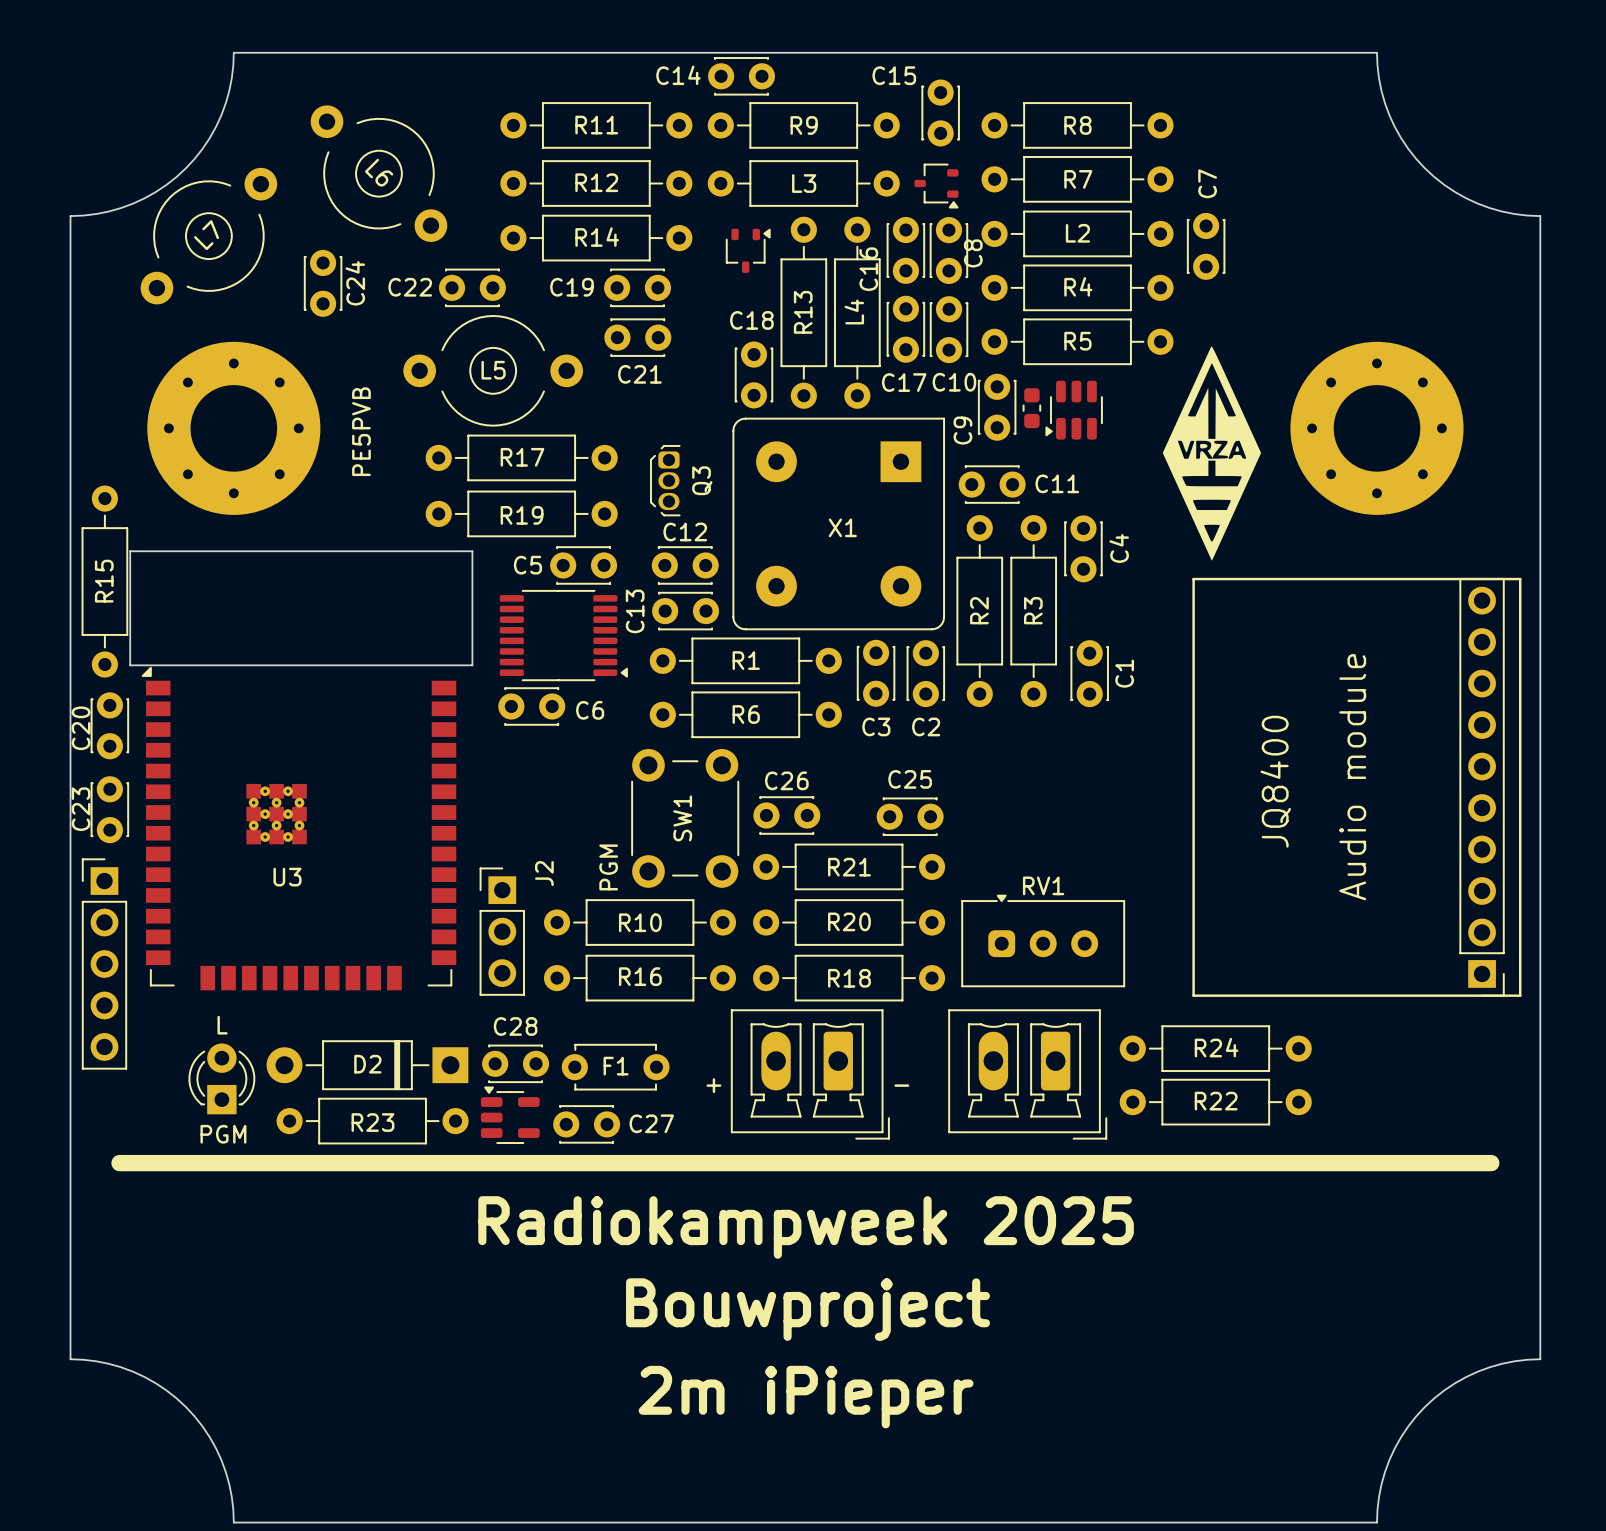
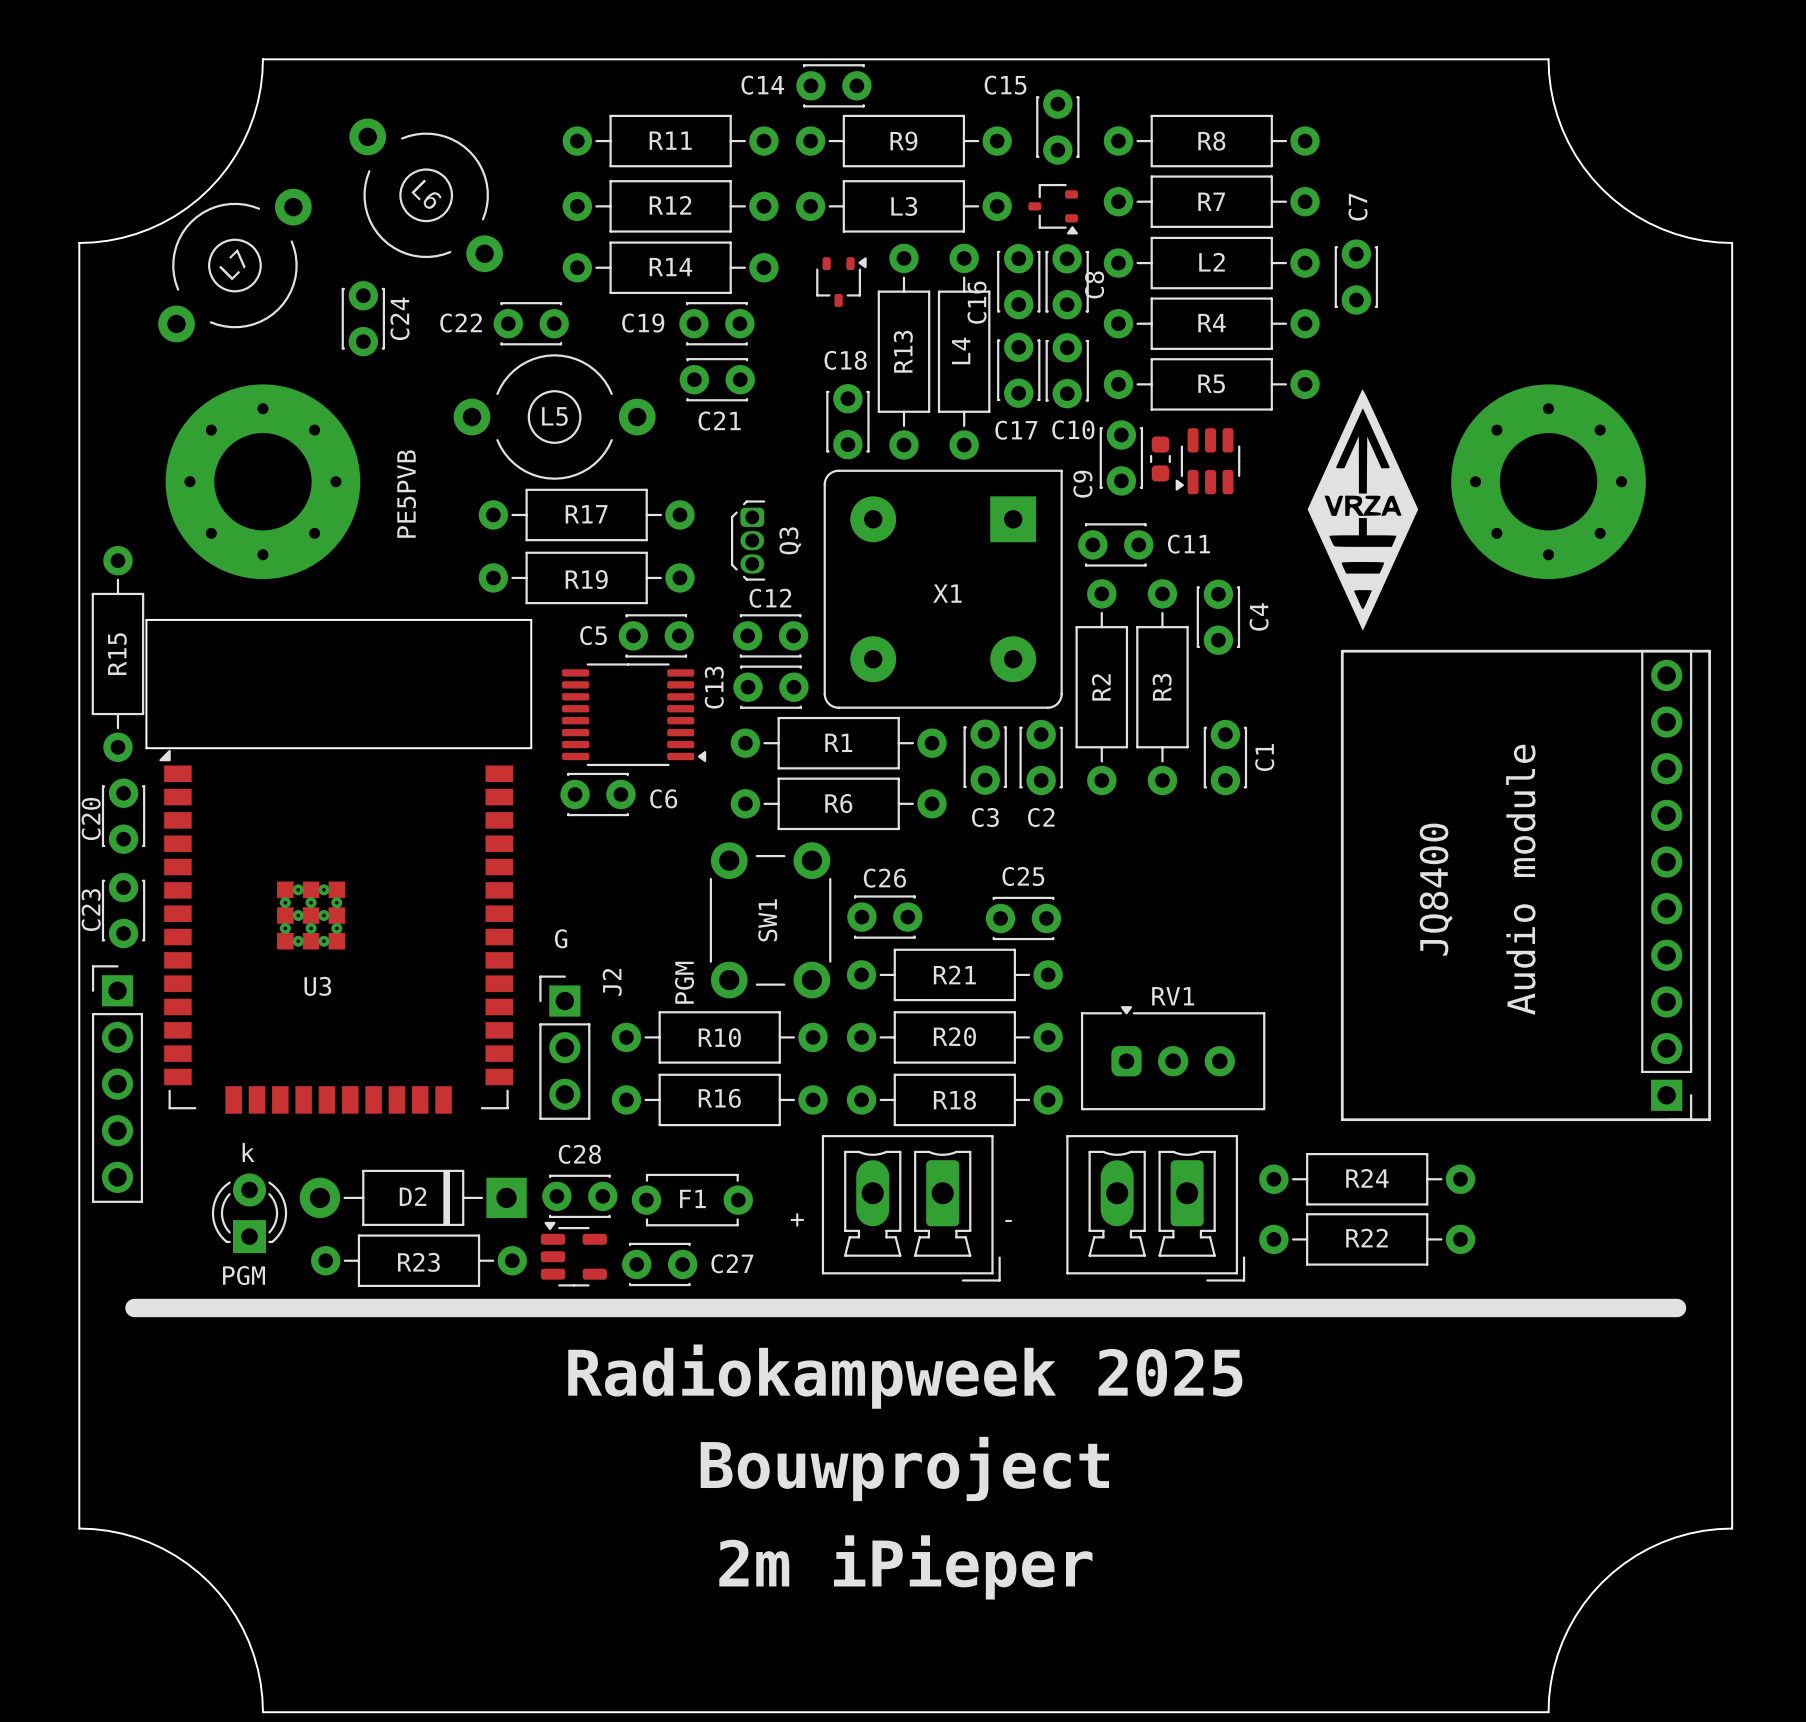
text: none -> G (561, 938)
text: L (222, 1025) -> k (248, 1152)

